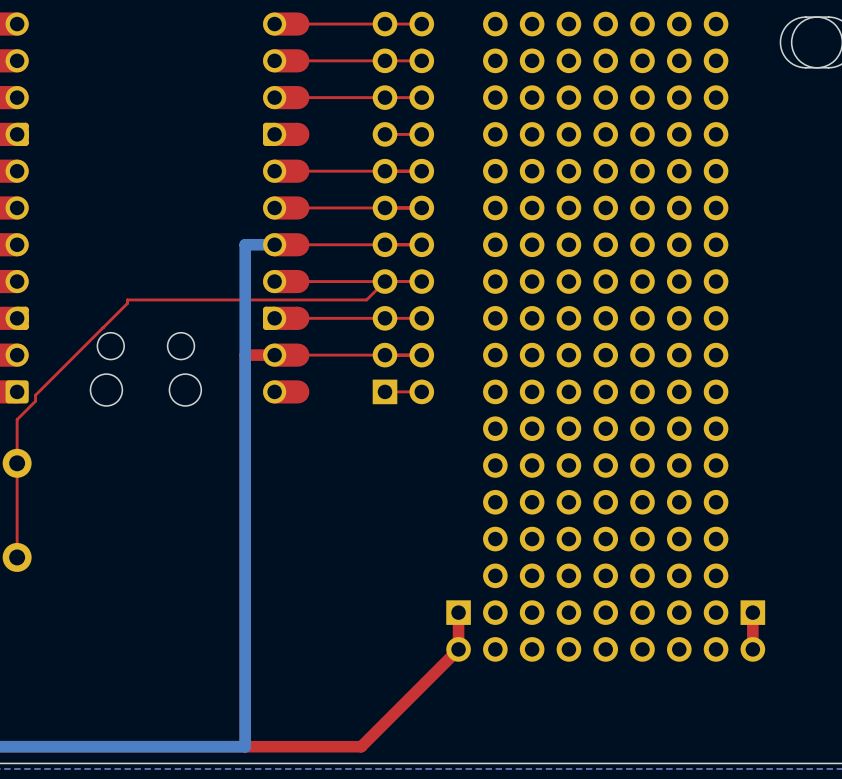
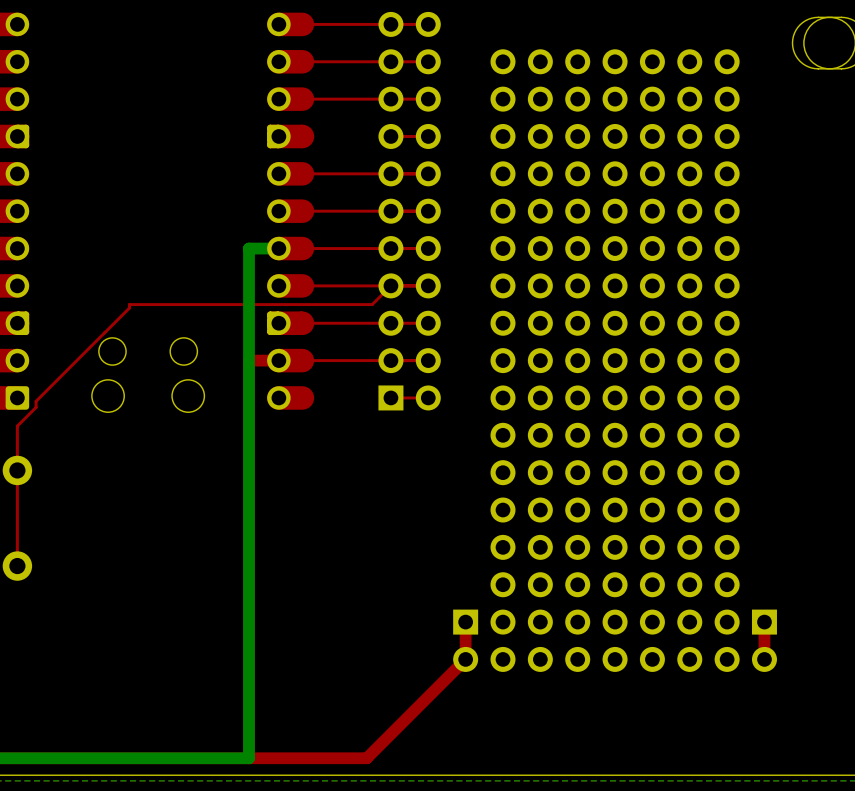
part: (495, 24) -> none
part: (532, 24) -> none
part: (568, 24) -> none
part: (605, 24) -> none
part: (642, 24) -> none
part: (679, 24) -> none
part: (716, 24) -> none

